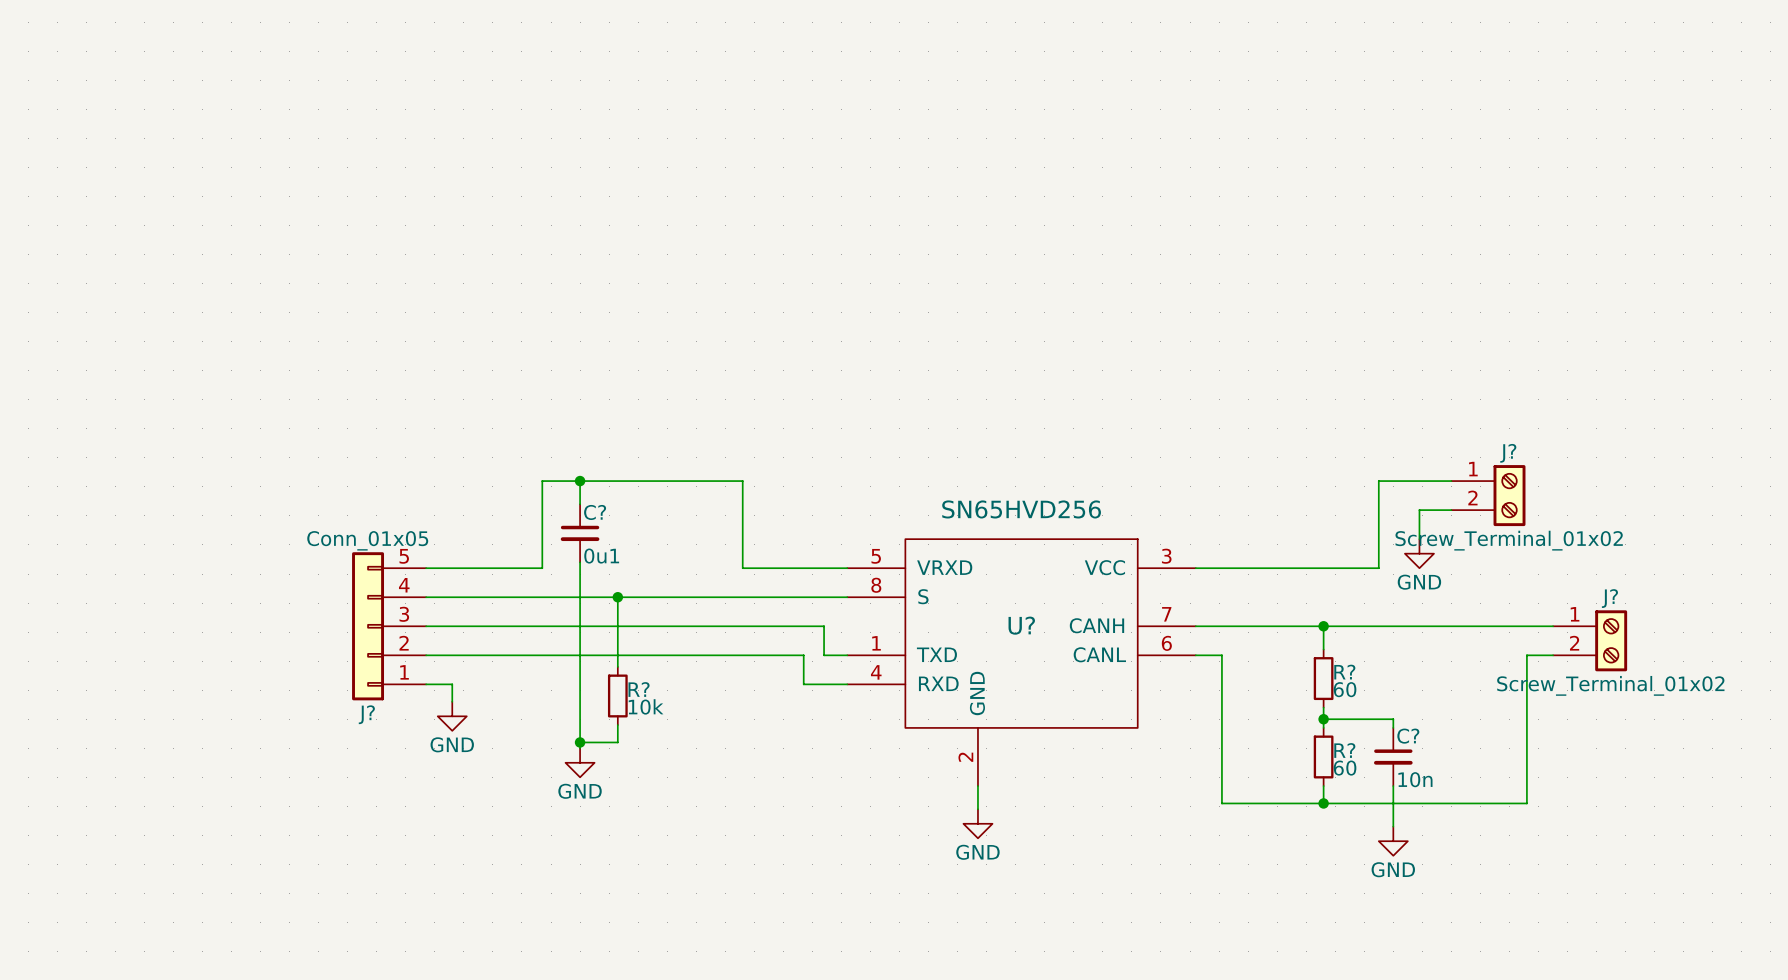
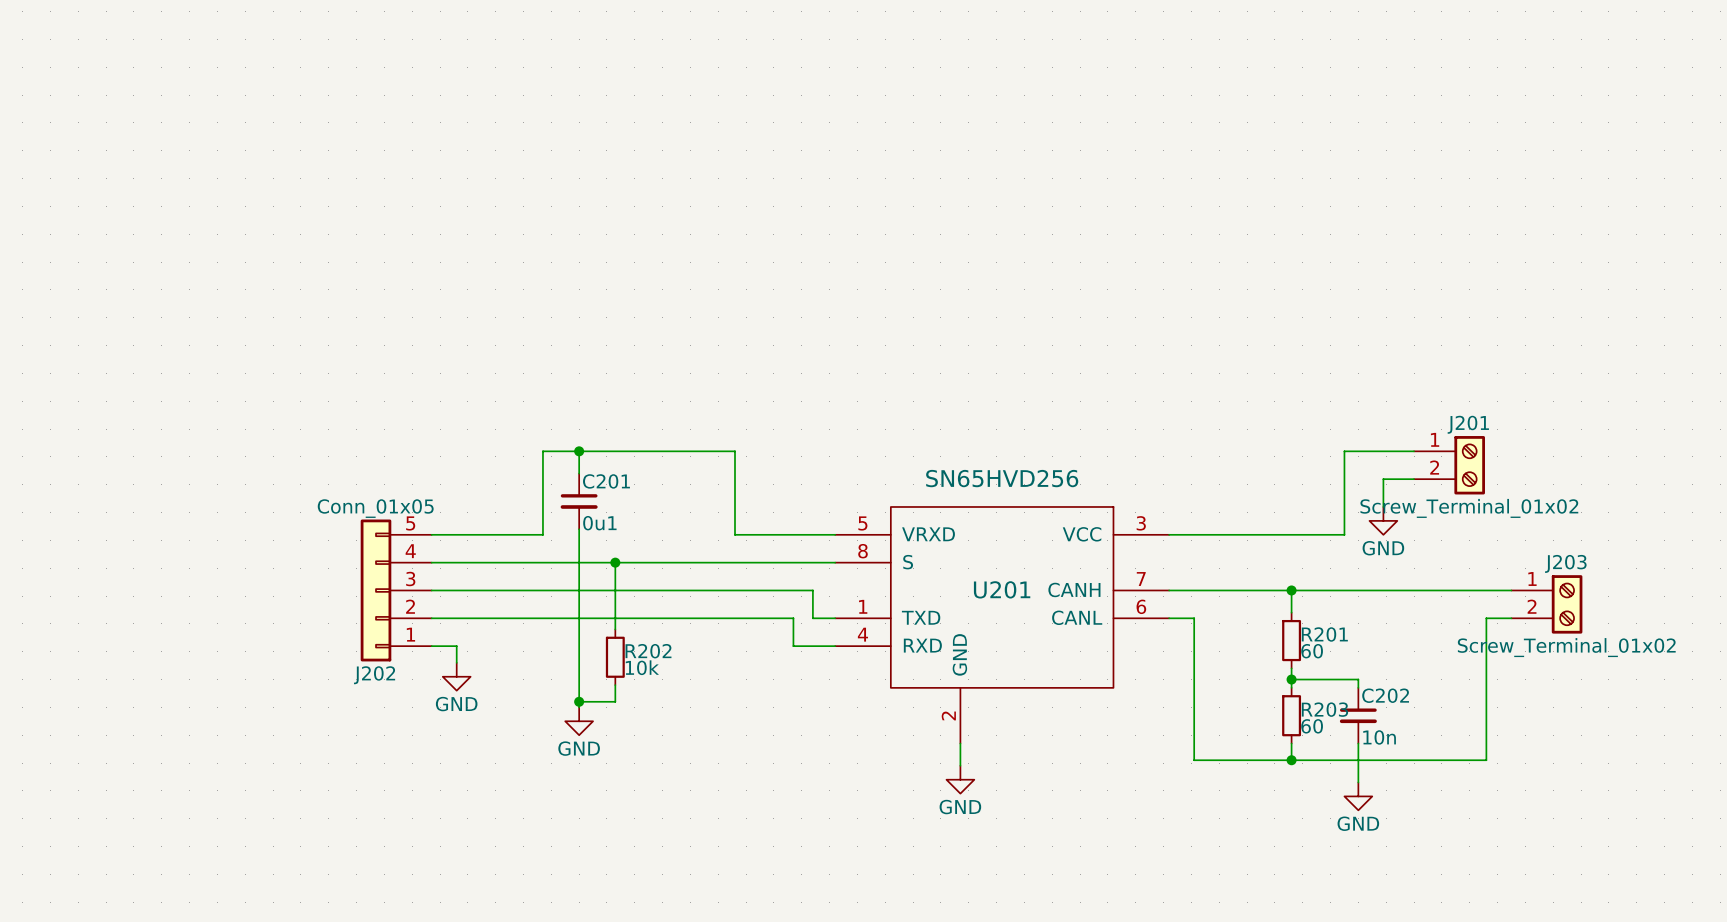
J? name: J? (1508, 453) -> J201 (1468, 424)
C? name: C? (595, 512) -> C201 (606, 481)
J? name: J? (1609, 598) -> J203 (1565, 563)
U? name: U? (1021, 625) -> U201 (1002, 589)
R? name: R? (1344, 672) -> R201 (1324, 634)
R? name: R? (639, 689) -> R202 (648, 651)
J? name: J? (366, 714) -> J202 (374, 675)
C? name: C? (1408, 736) -> C202 (1385, 695)
R? name: R? (1344, 750) -> R203 (1324, 709)

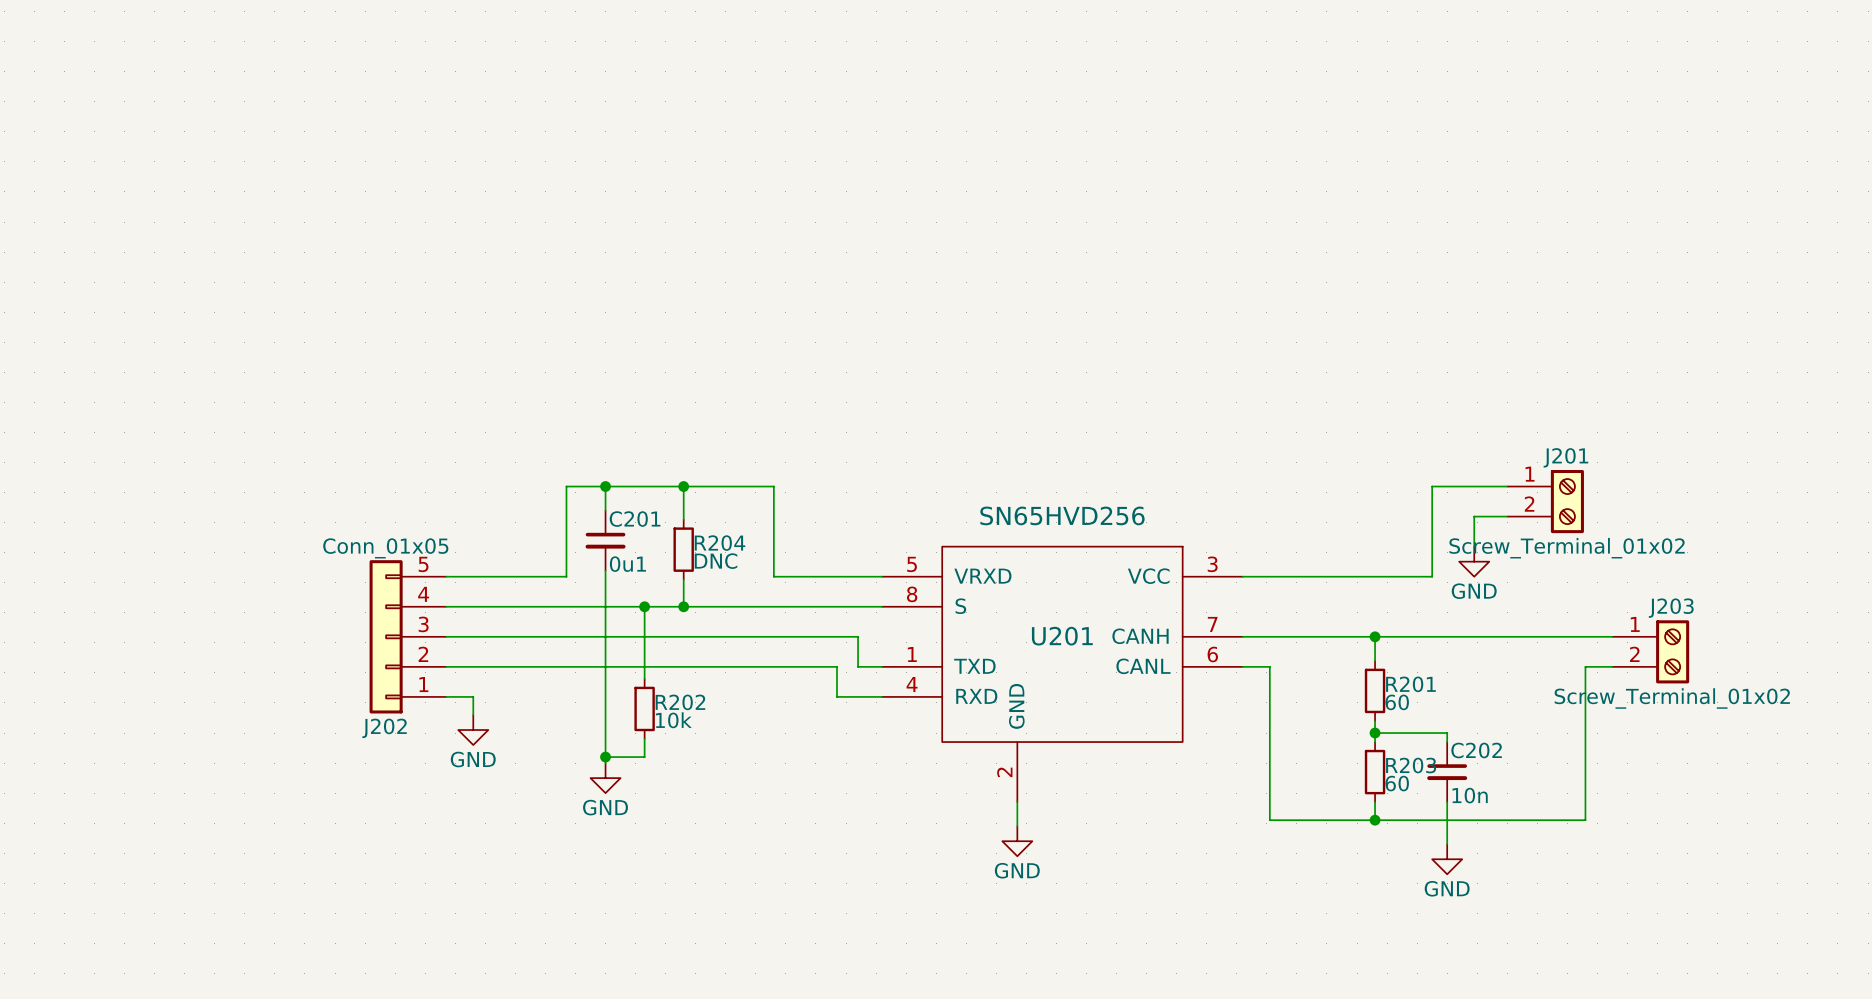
wire: none -> (683, 486) (683, 519)
junction: none -> (683, 486)
R204: none -> DNC (683, 549)
wire: none -> (683, 579) (683, 606)
junction: none -> (683, 606)

